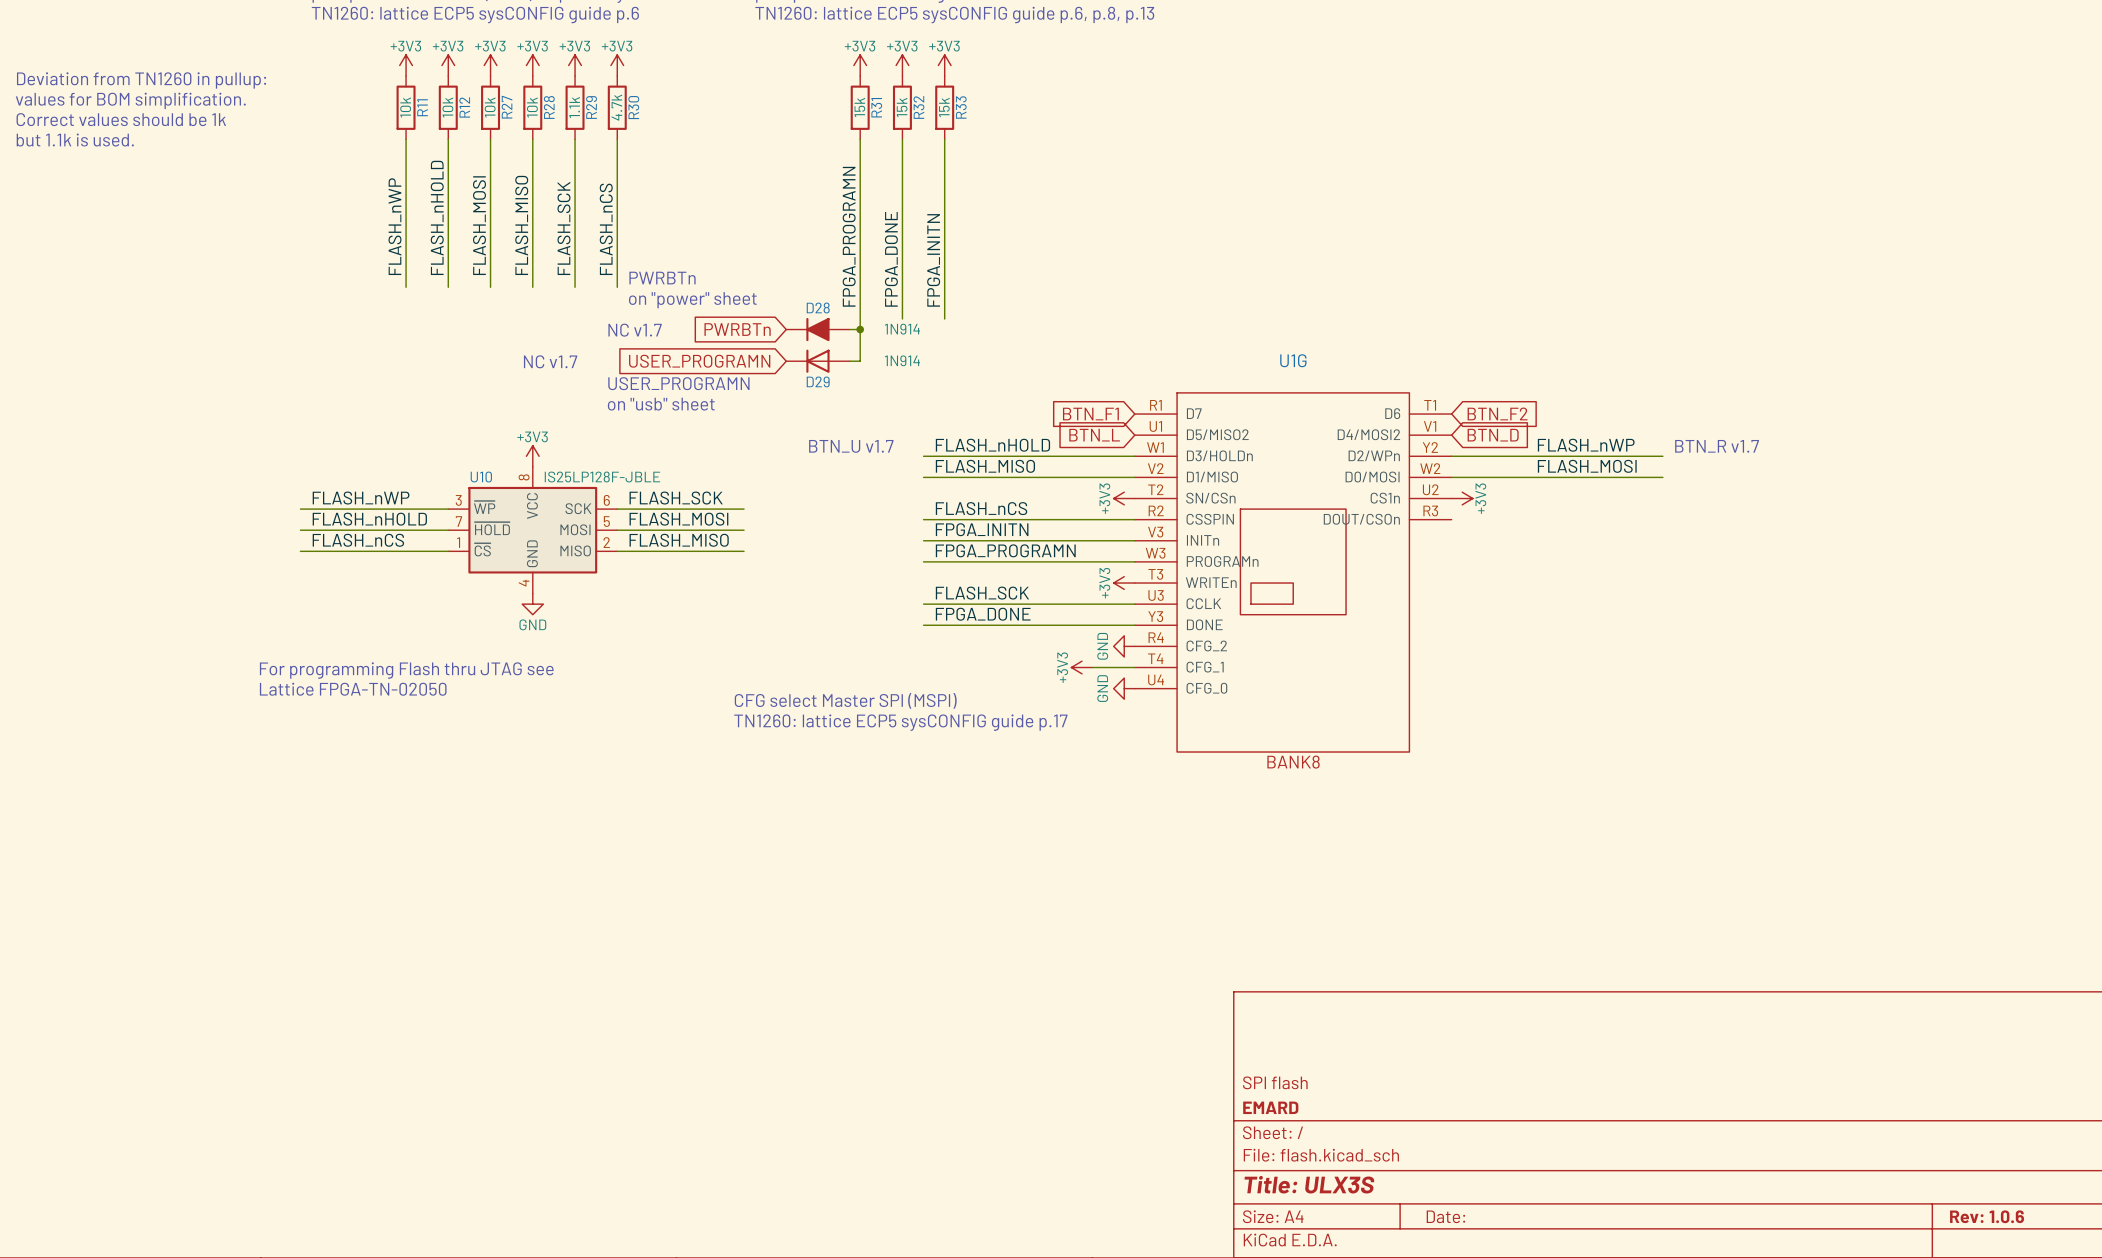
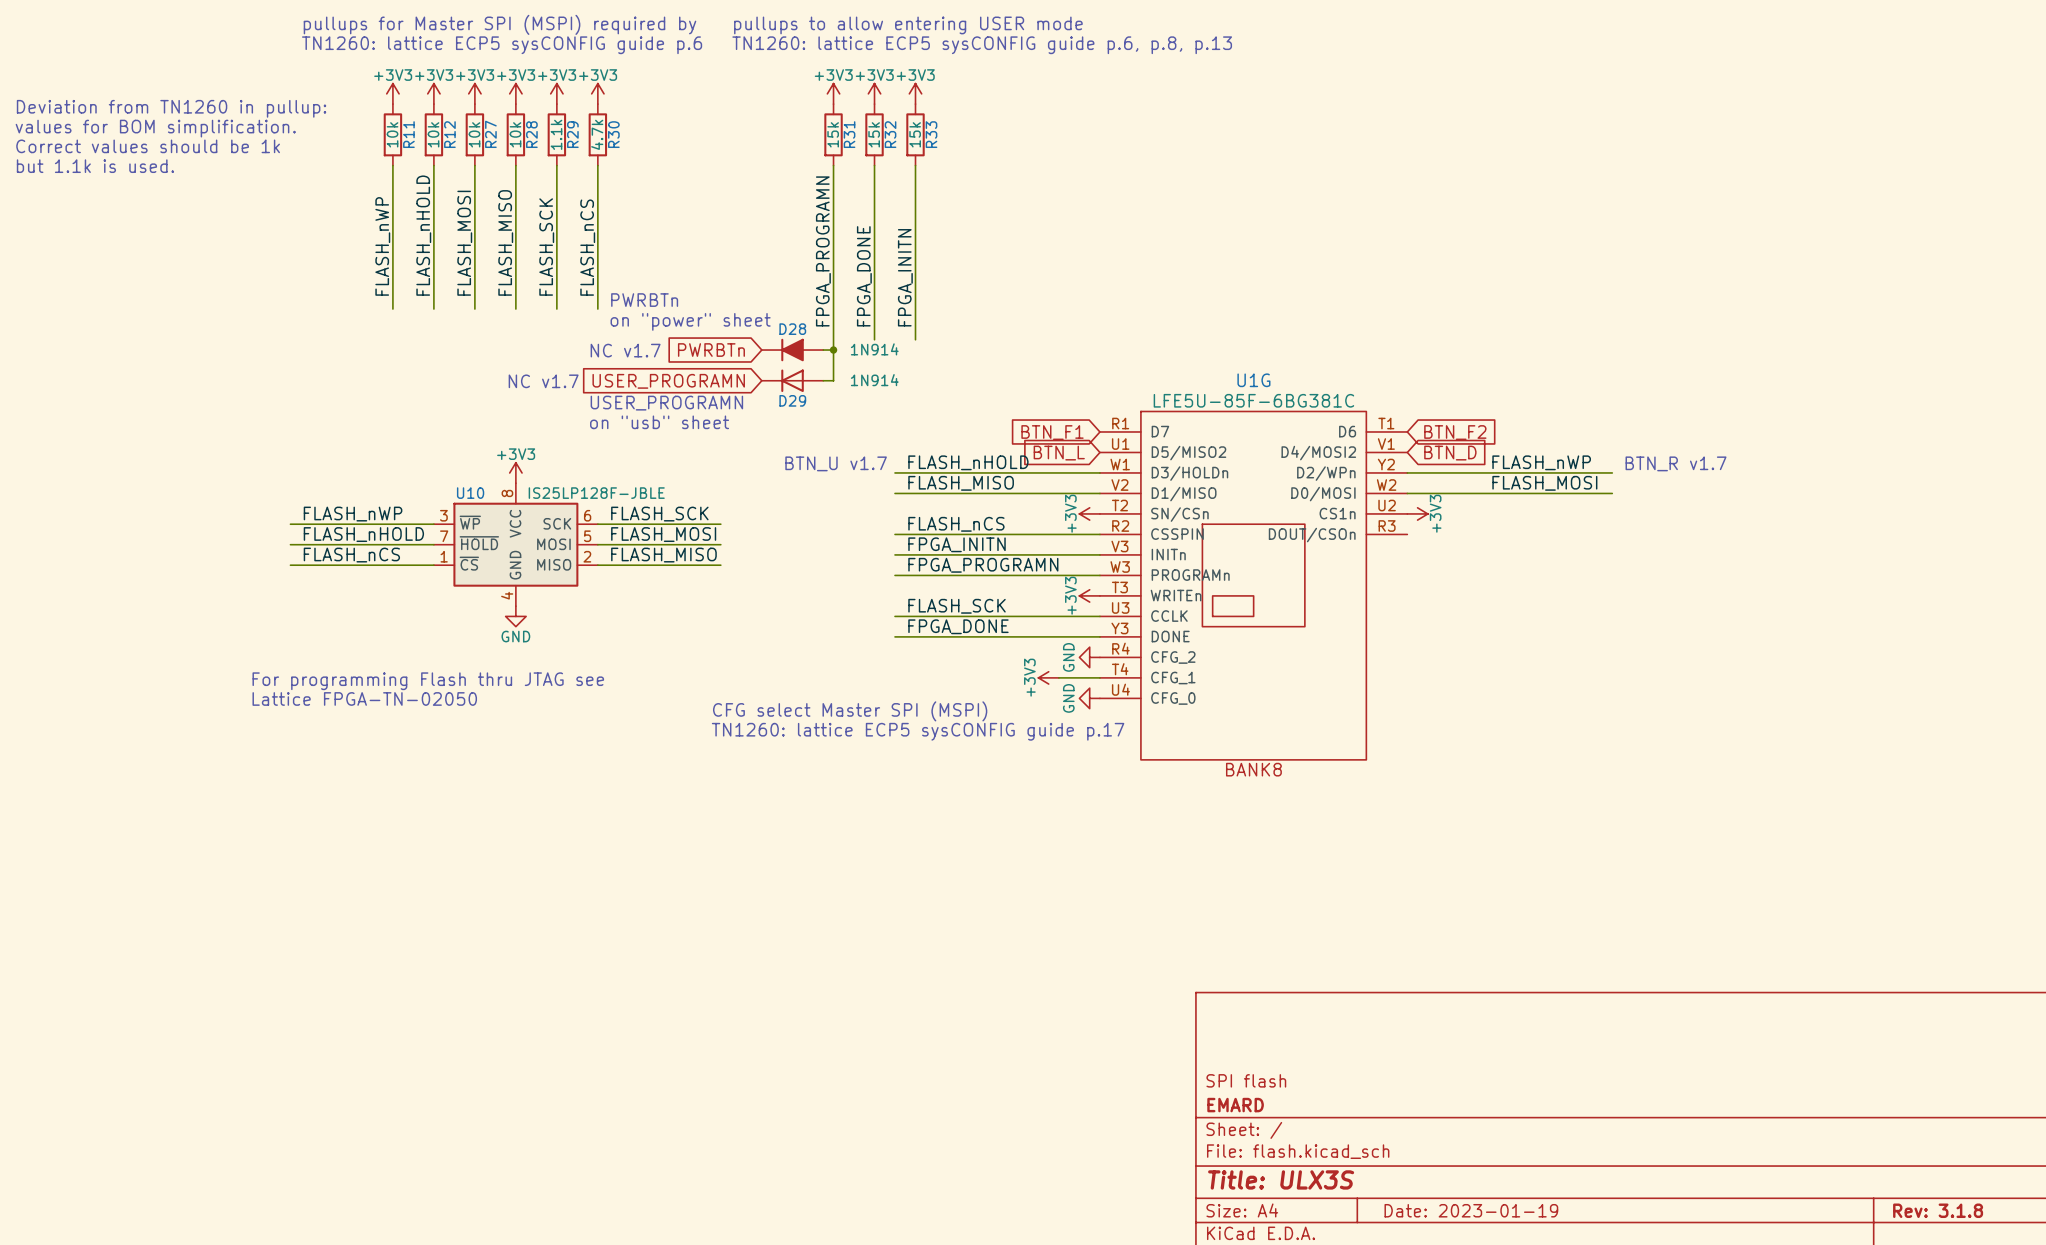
U1G value: none -> LFE5U-85F-6BG381C (1253, 400)
title block: Date: (1445, 1216) -> Date: 2023-01-19 (1471, 1210)
title block: Rev: 1.0.6 (1987, 1216) -> Rev: 3.1.8 (1938, 1210)

